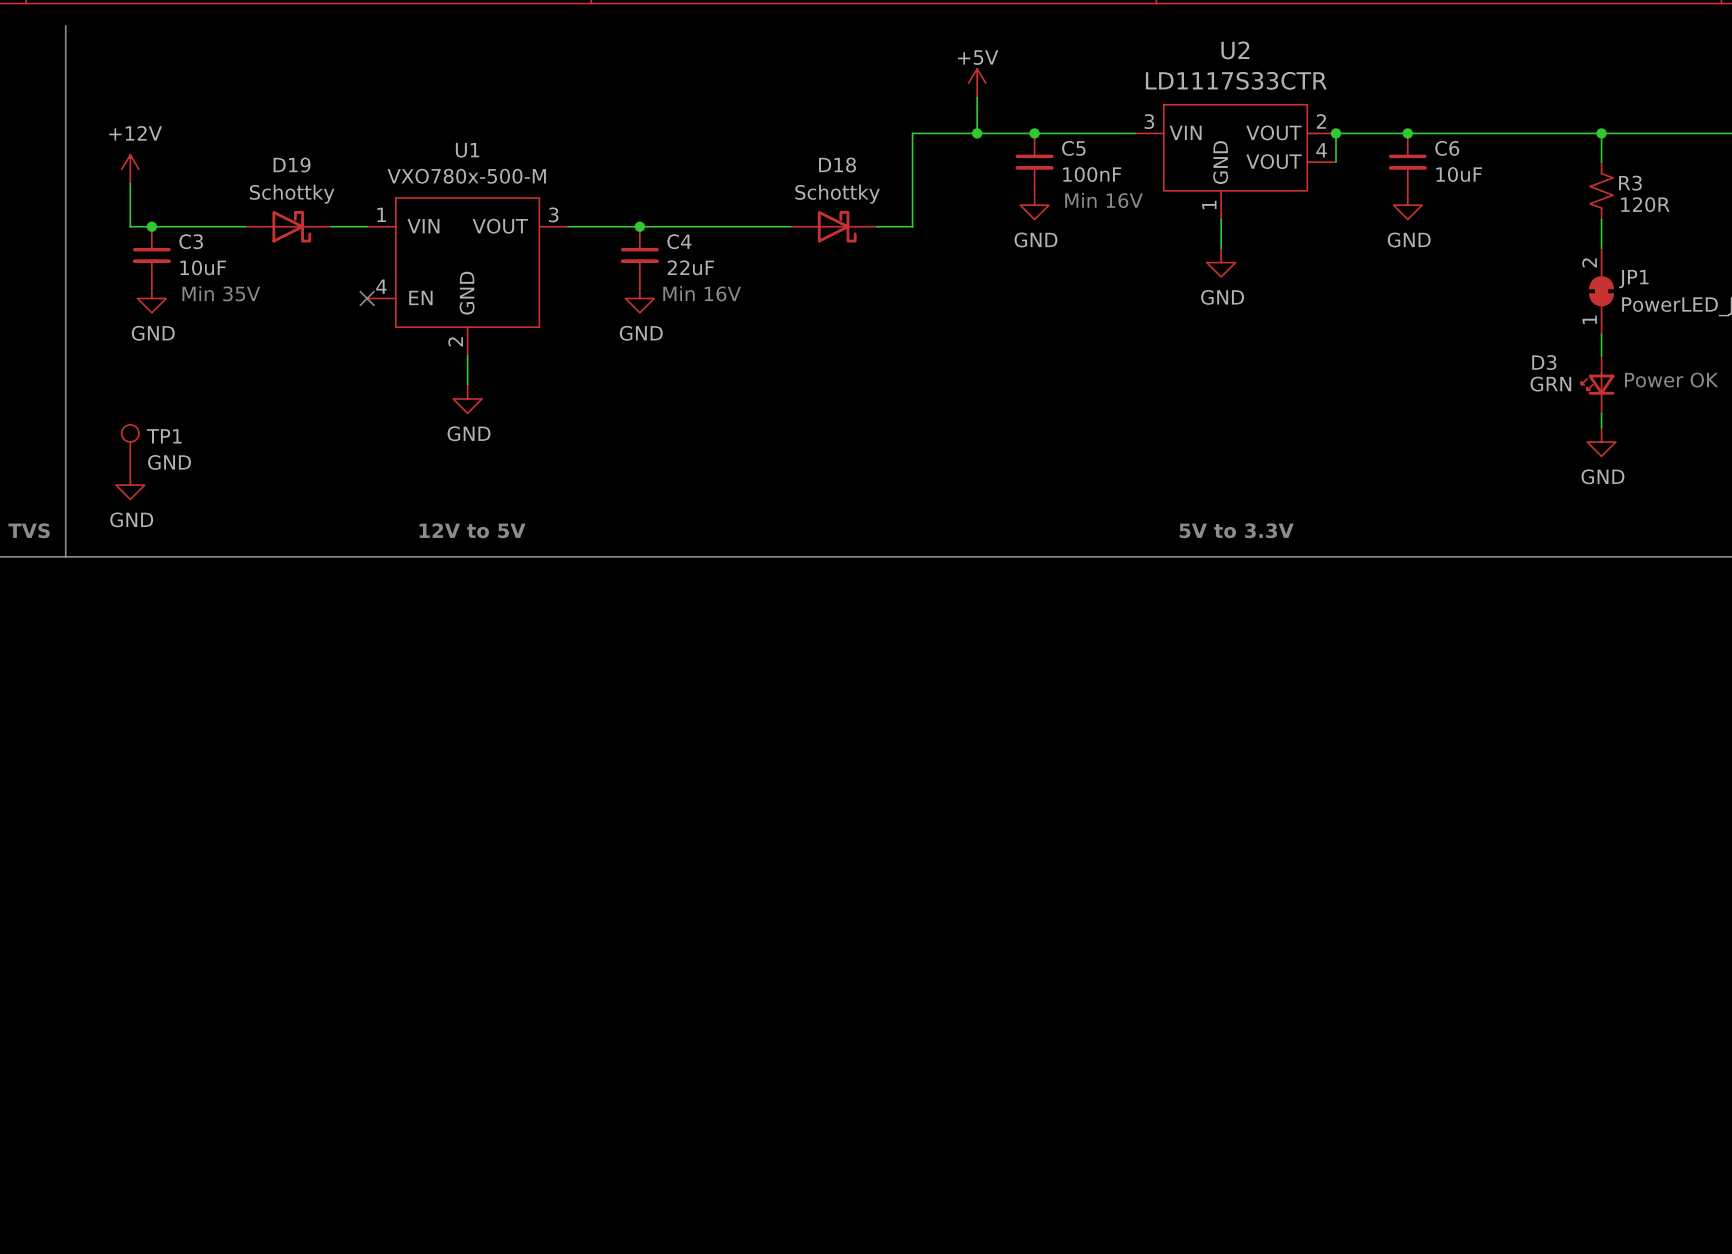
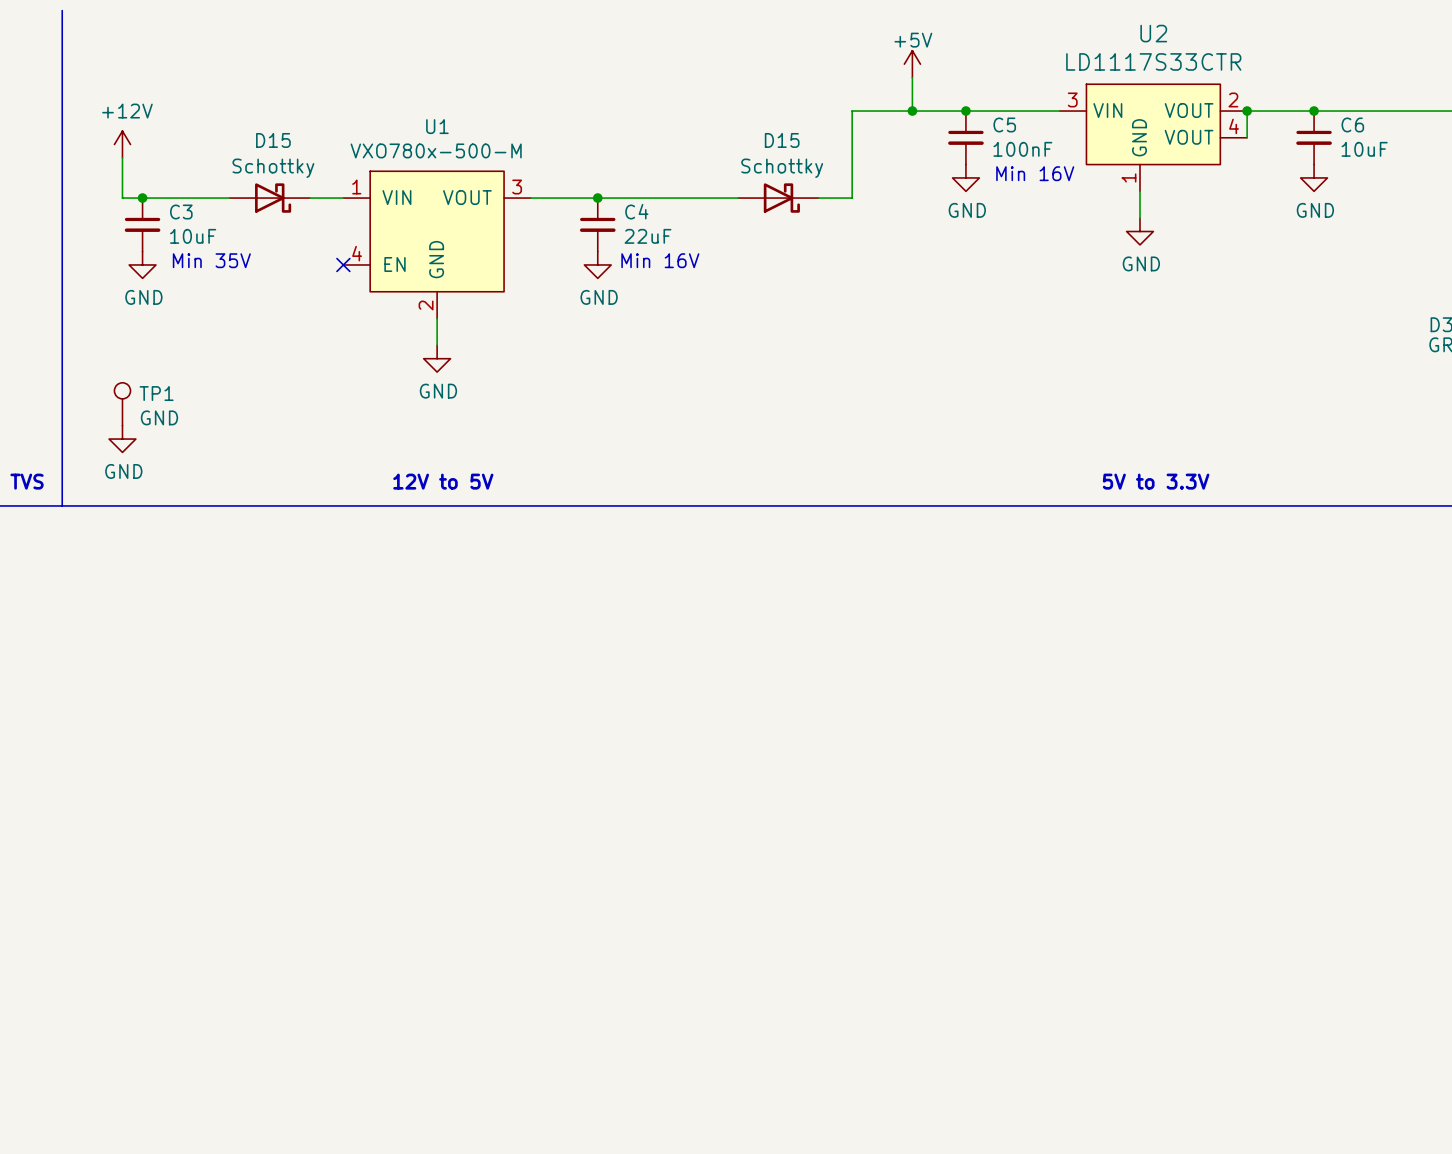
D19 name: D19 (292, 165) -> D15 (273, 140)
D18 name: D18 (837, 165) -> D15 (782, 140)

